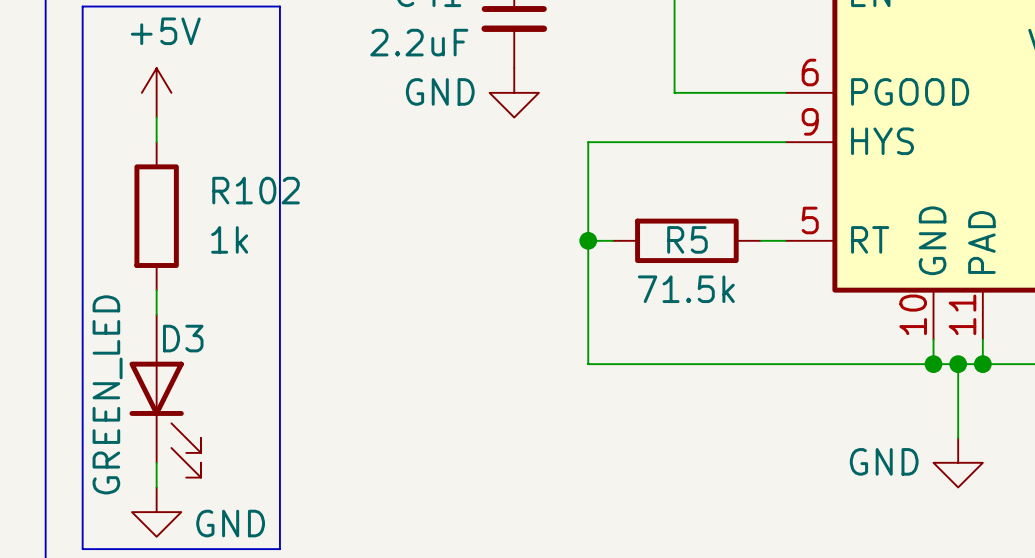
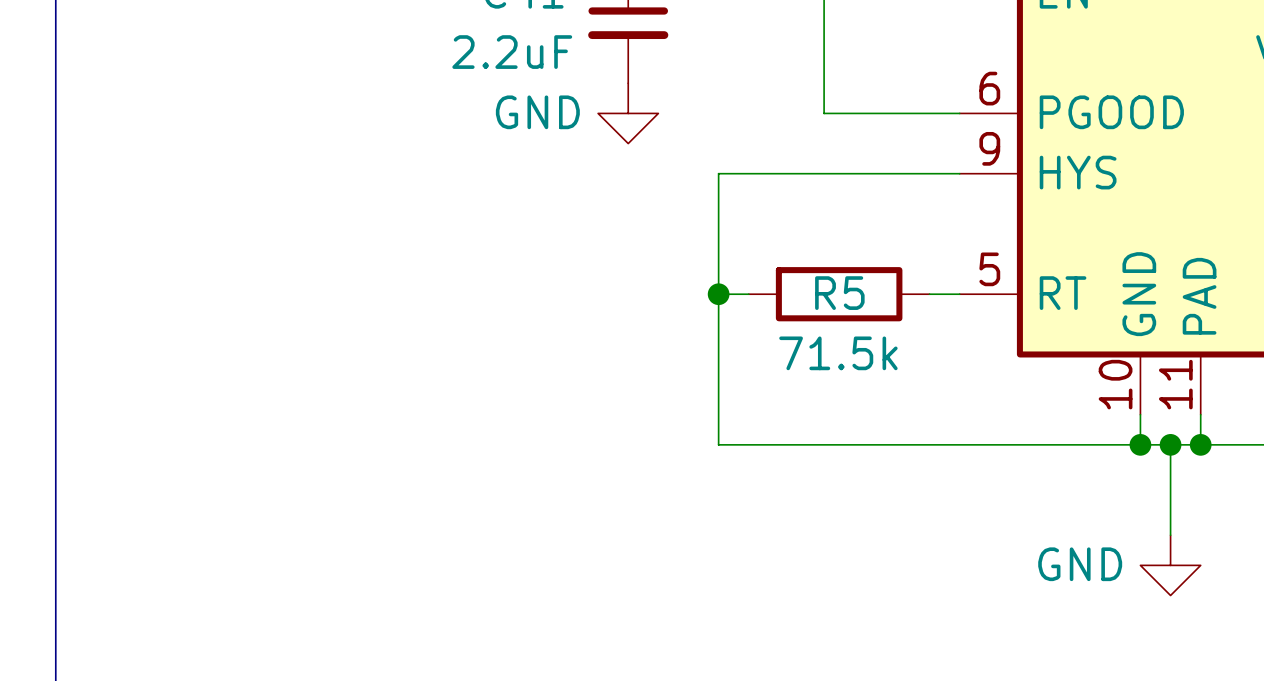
line: (82, 6) (82, 549) (279, 549) (279, 6) (82, 6) -> none
power symbol: +5V (156, 92) -> none
wire: (156, 117) (156, 142) -> none
R102: 1k (156, 216) -> none
wire: (156, 290) (156, 314) -> none
D3: GREEN_LED (165, 396) -> none
wire: (156, 462) (156, 487) -> none
power symbol: GND (156, 512) -> none

